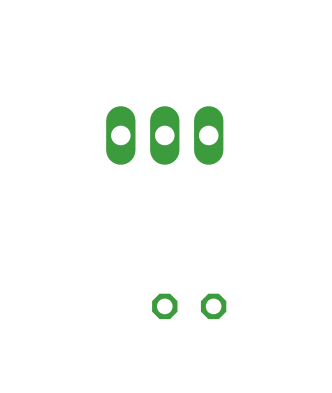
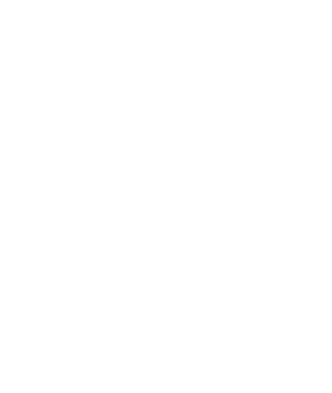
part: (164, 135) -> none
part: (189, 306) -> none

